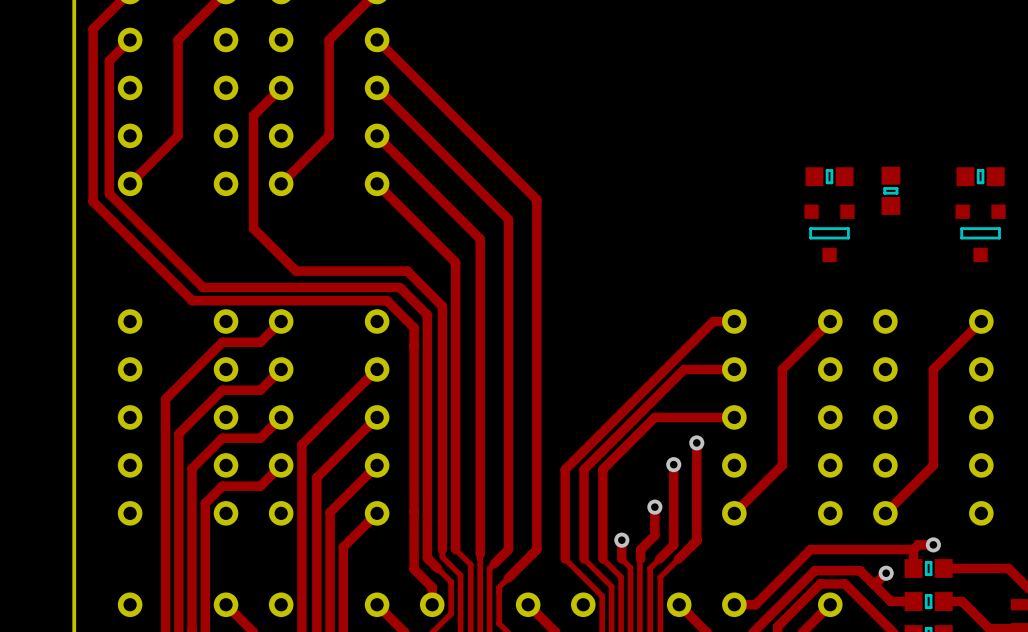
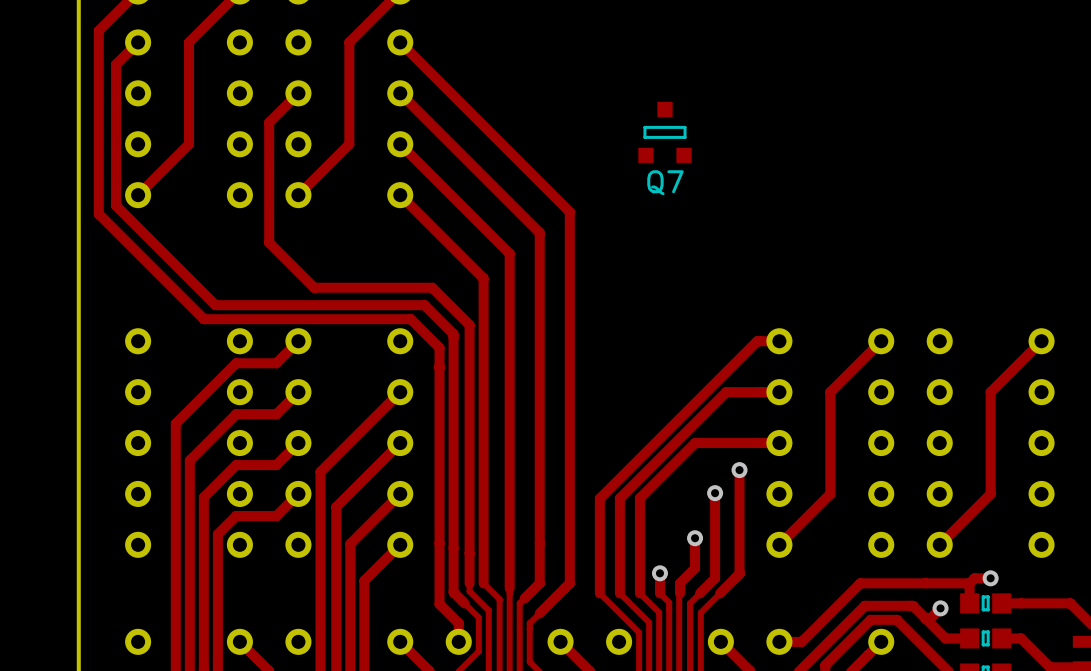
Q7: none -> (664, 132)
part: (829, 176) -> none
part: (980, 176) -> none
part: (890, 190) -> none
part: (829, 233) -> none
part: (980, 233) -> none

